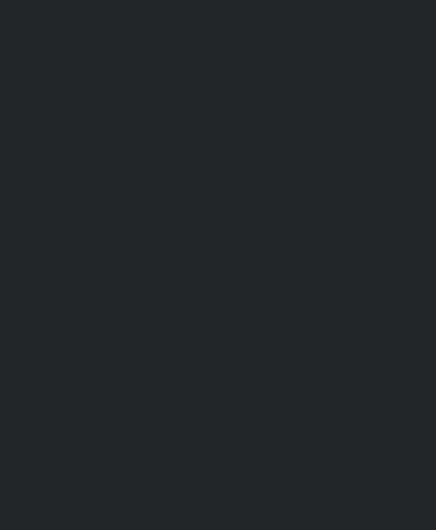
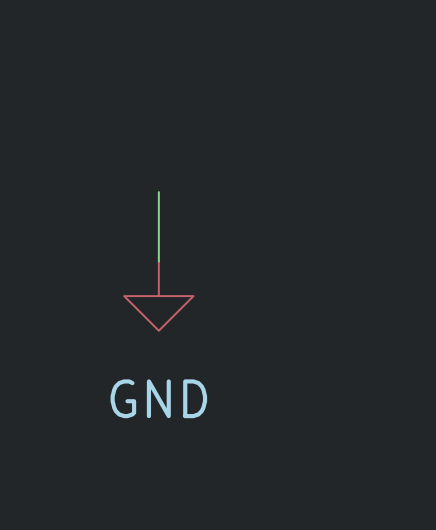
wire: none -> (158, 192) (158, 261)
power symbol: none -> GND (158, 296)

